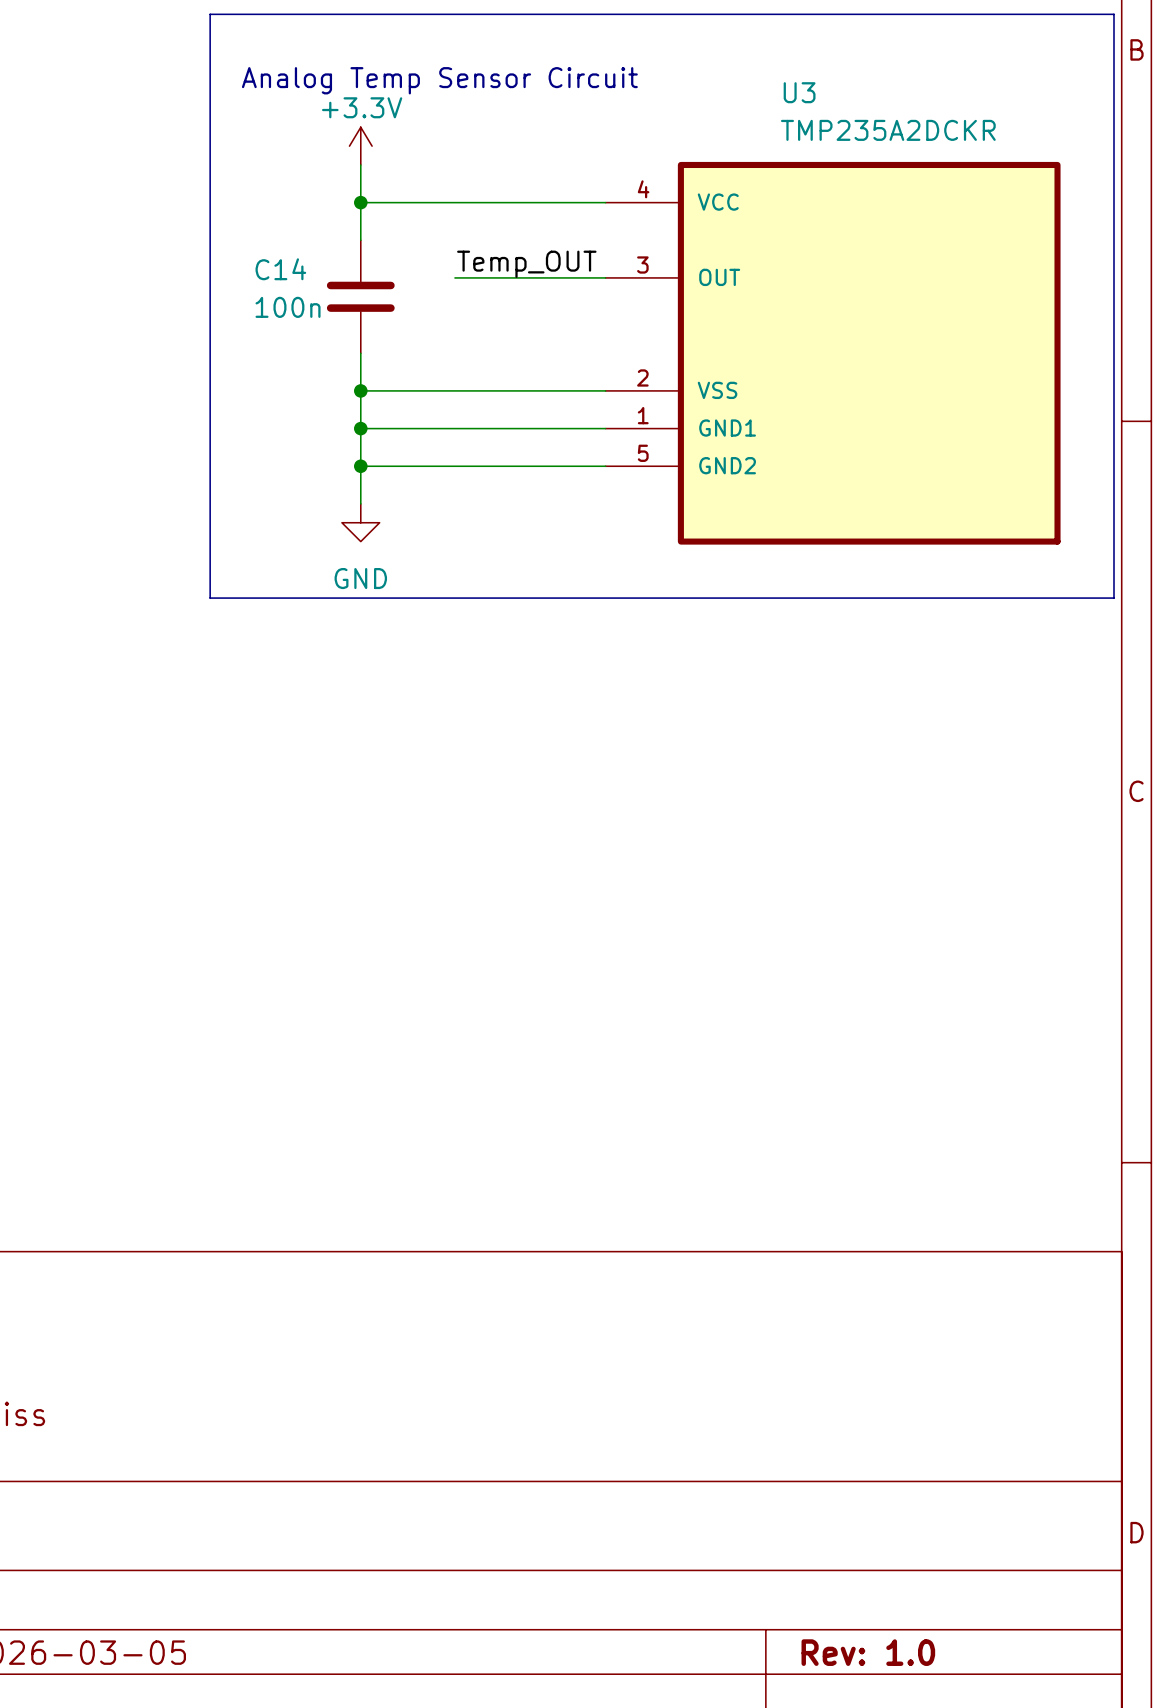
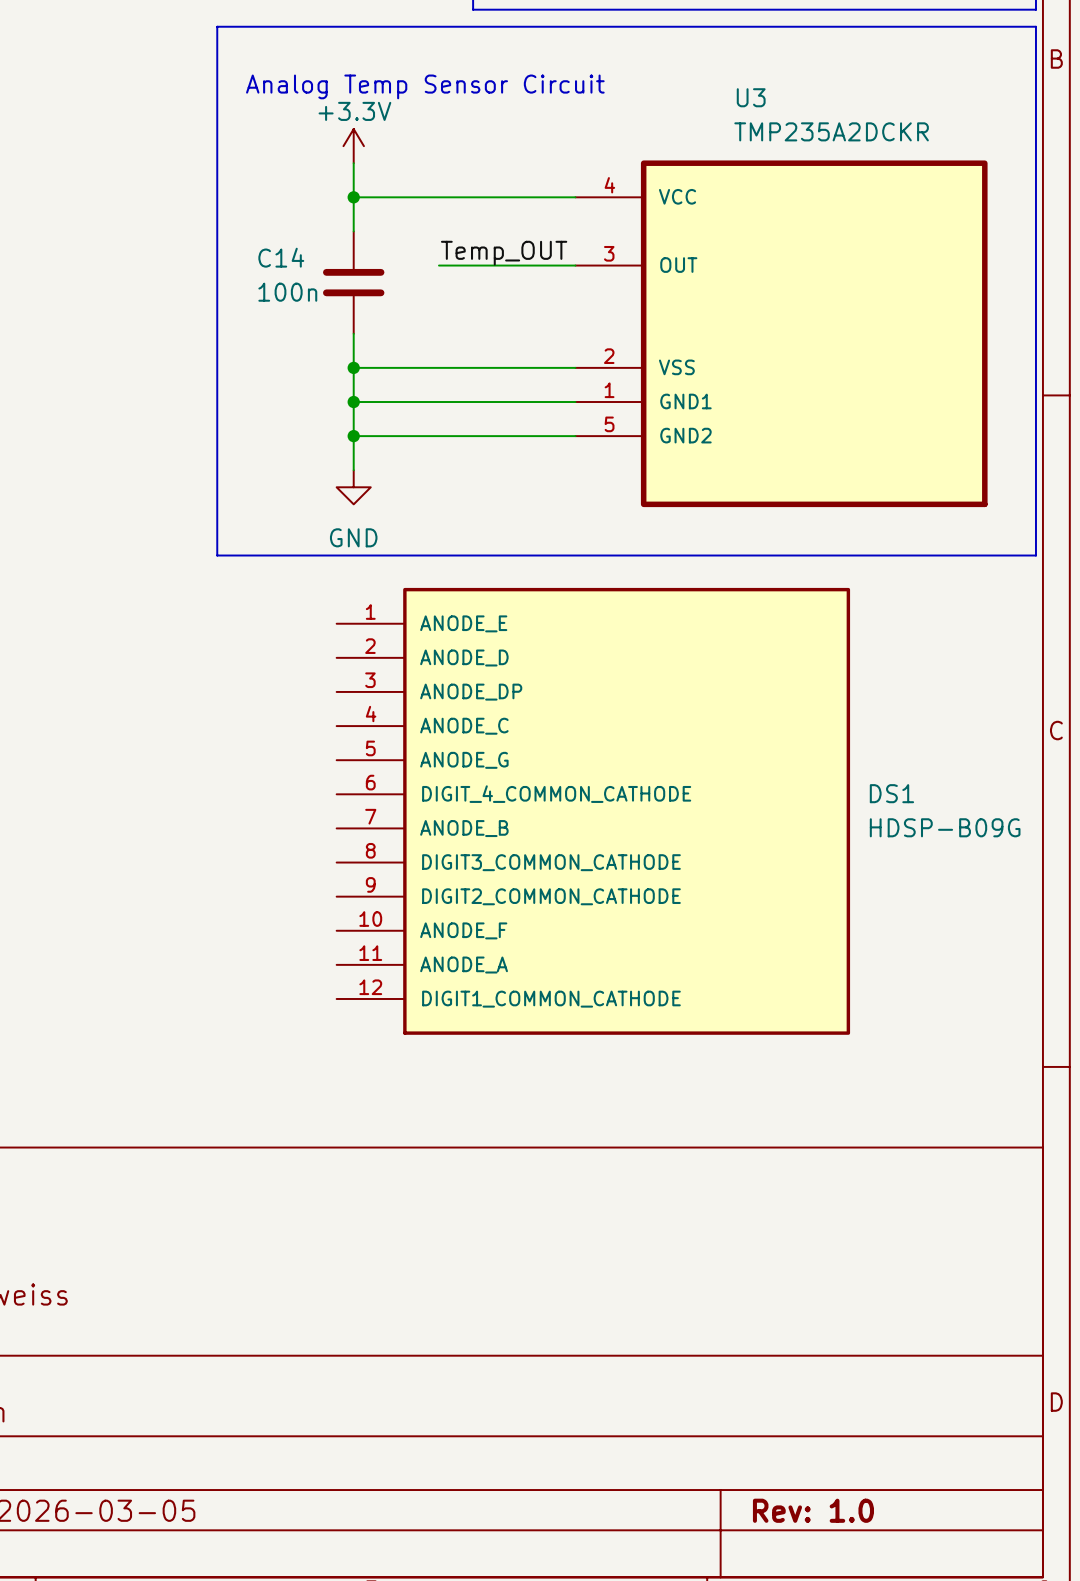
DS1: none -> HDSP-B09G (593, 811)

